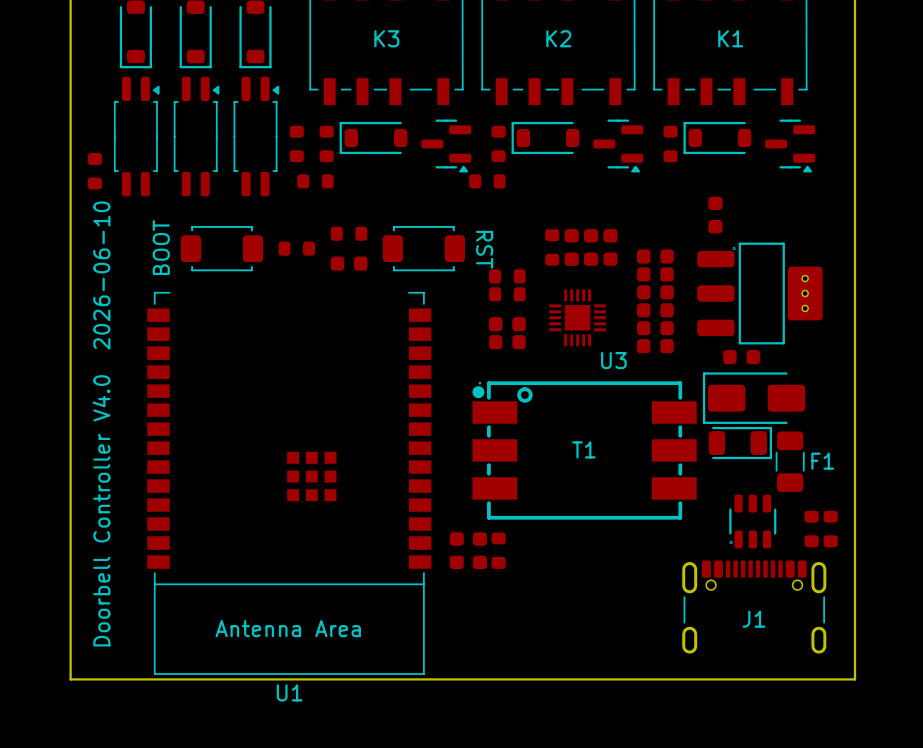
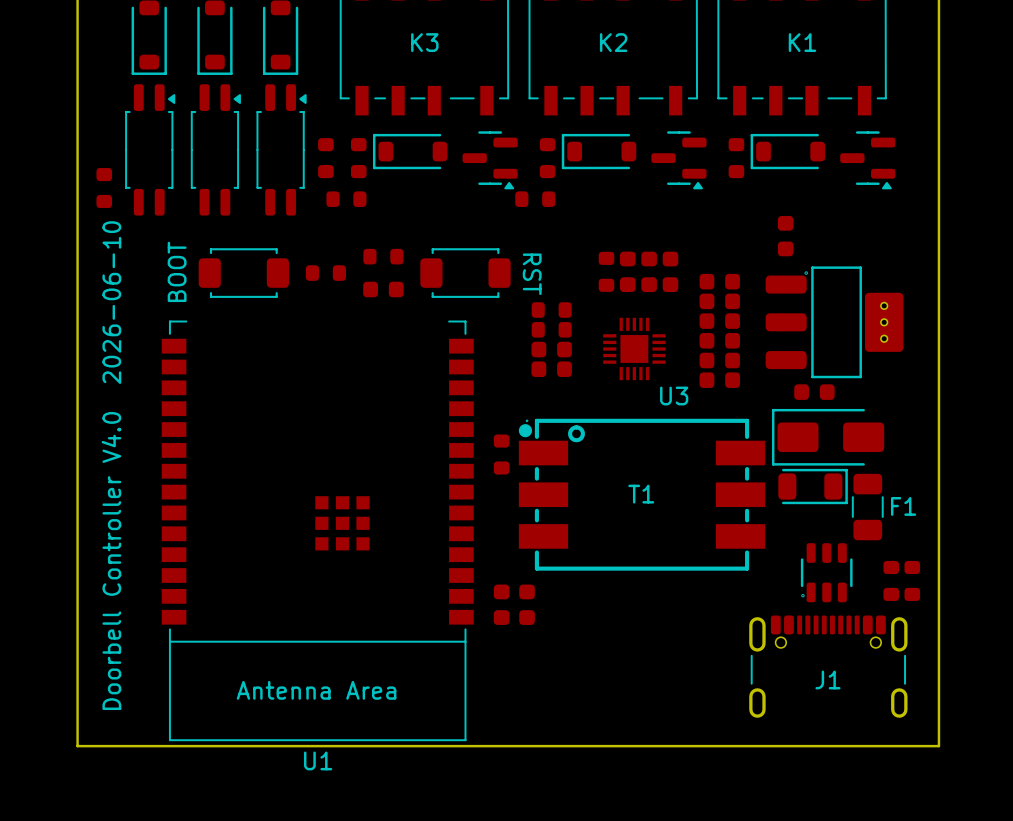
part: (507, 276) -> none
part: none -> (551, 310)
part: (507, 294) -> none
part: none -> (551, 329)
part: none -> (551, 349)
part: (507, 324) -> none
part: none -> (551, 369)
part: (507, 342) -> none
part: none -> (501, 454)
part: (498, 550) -> none

